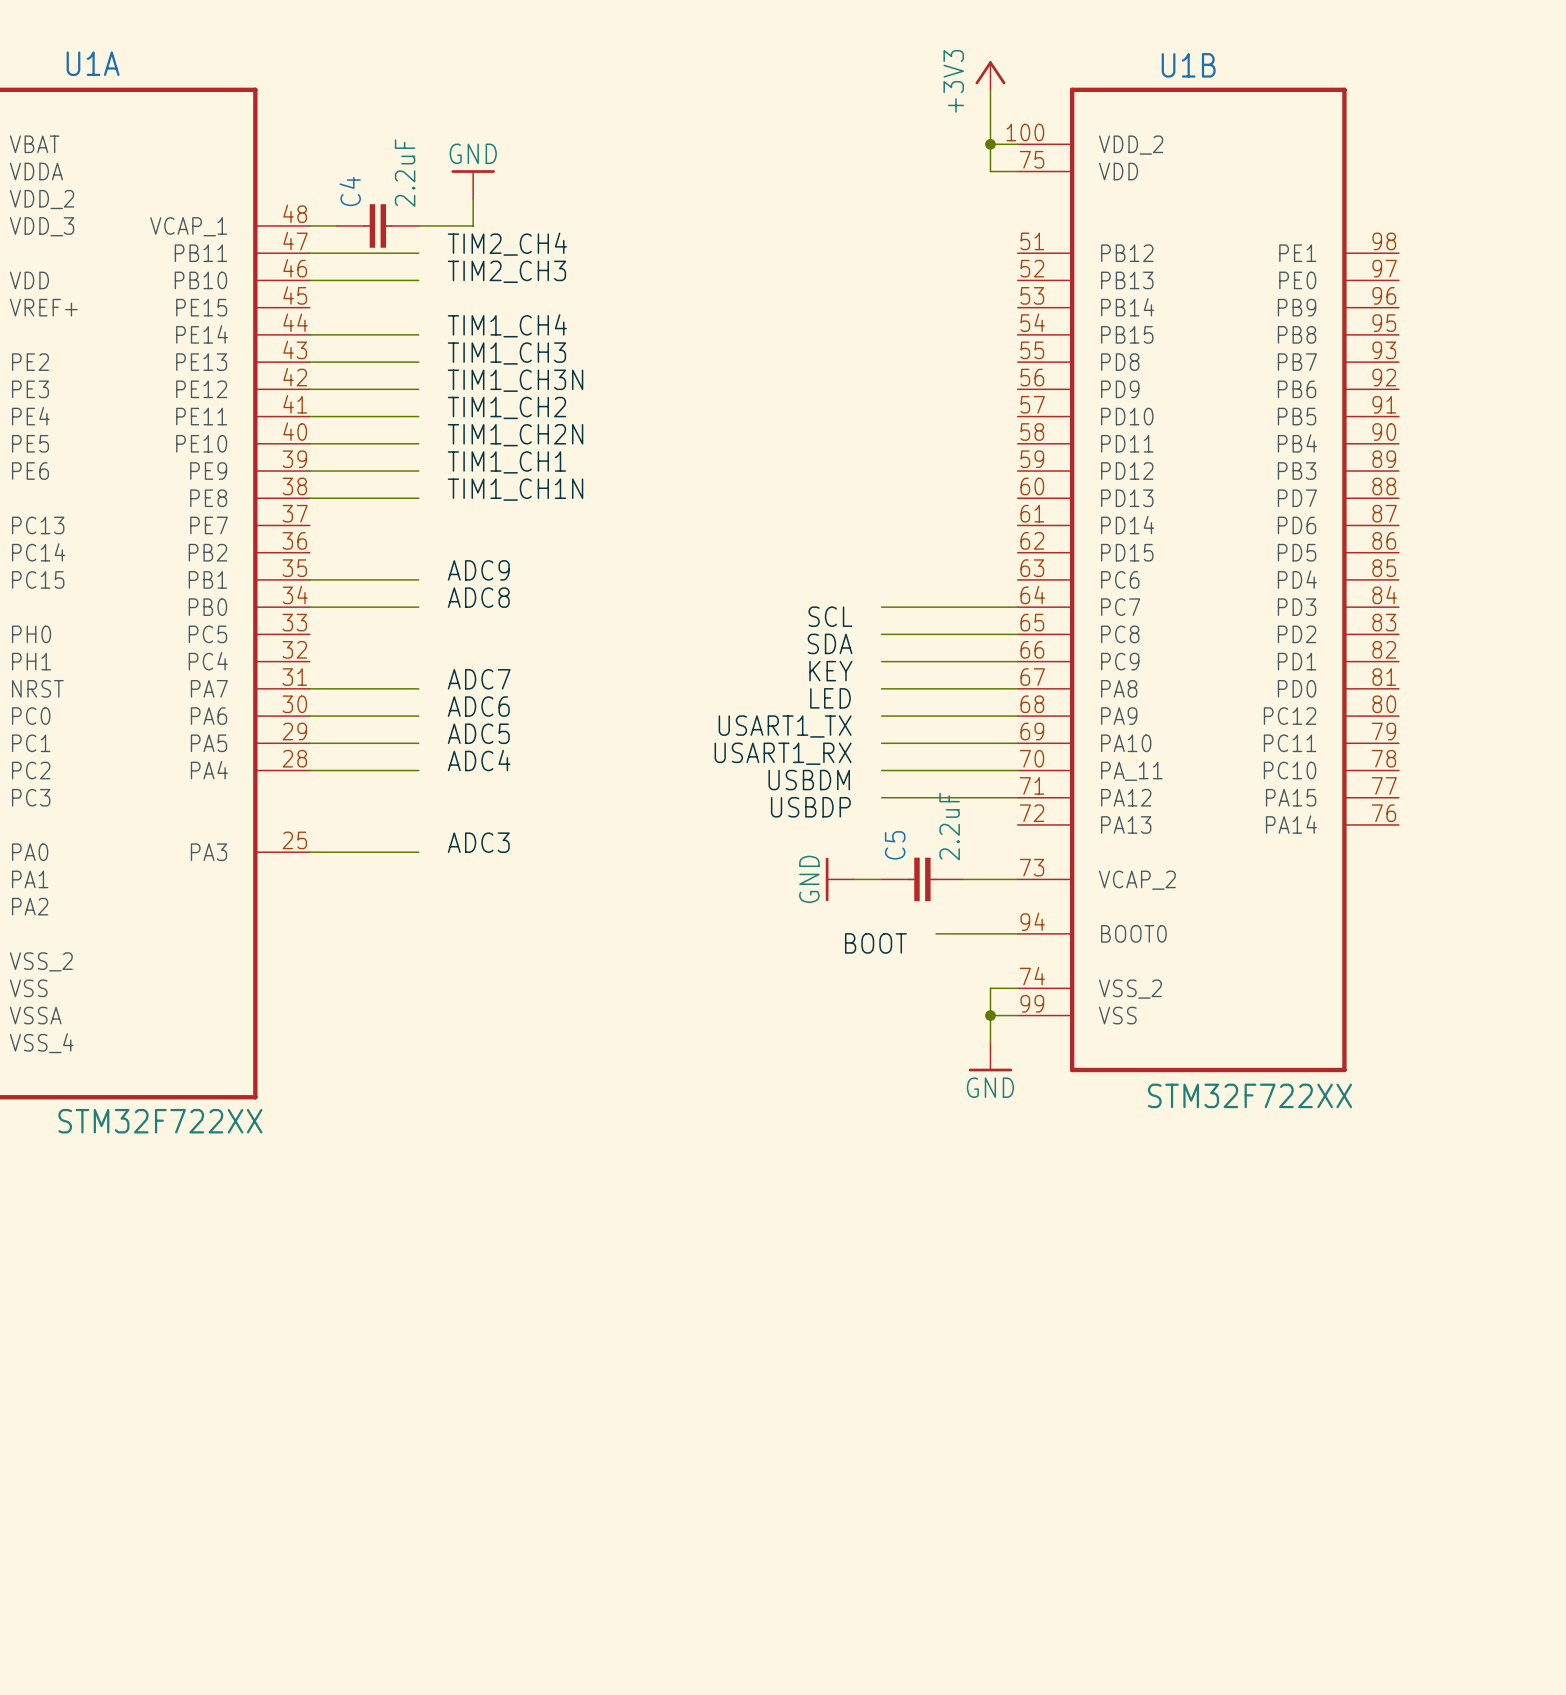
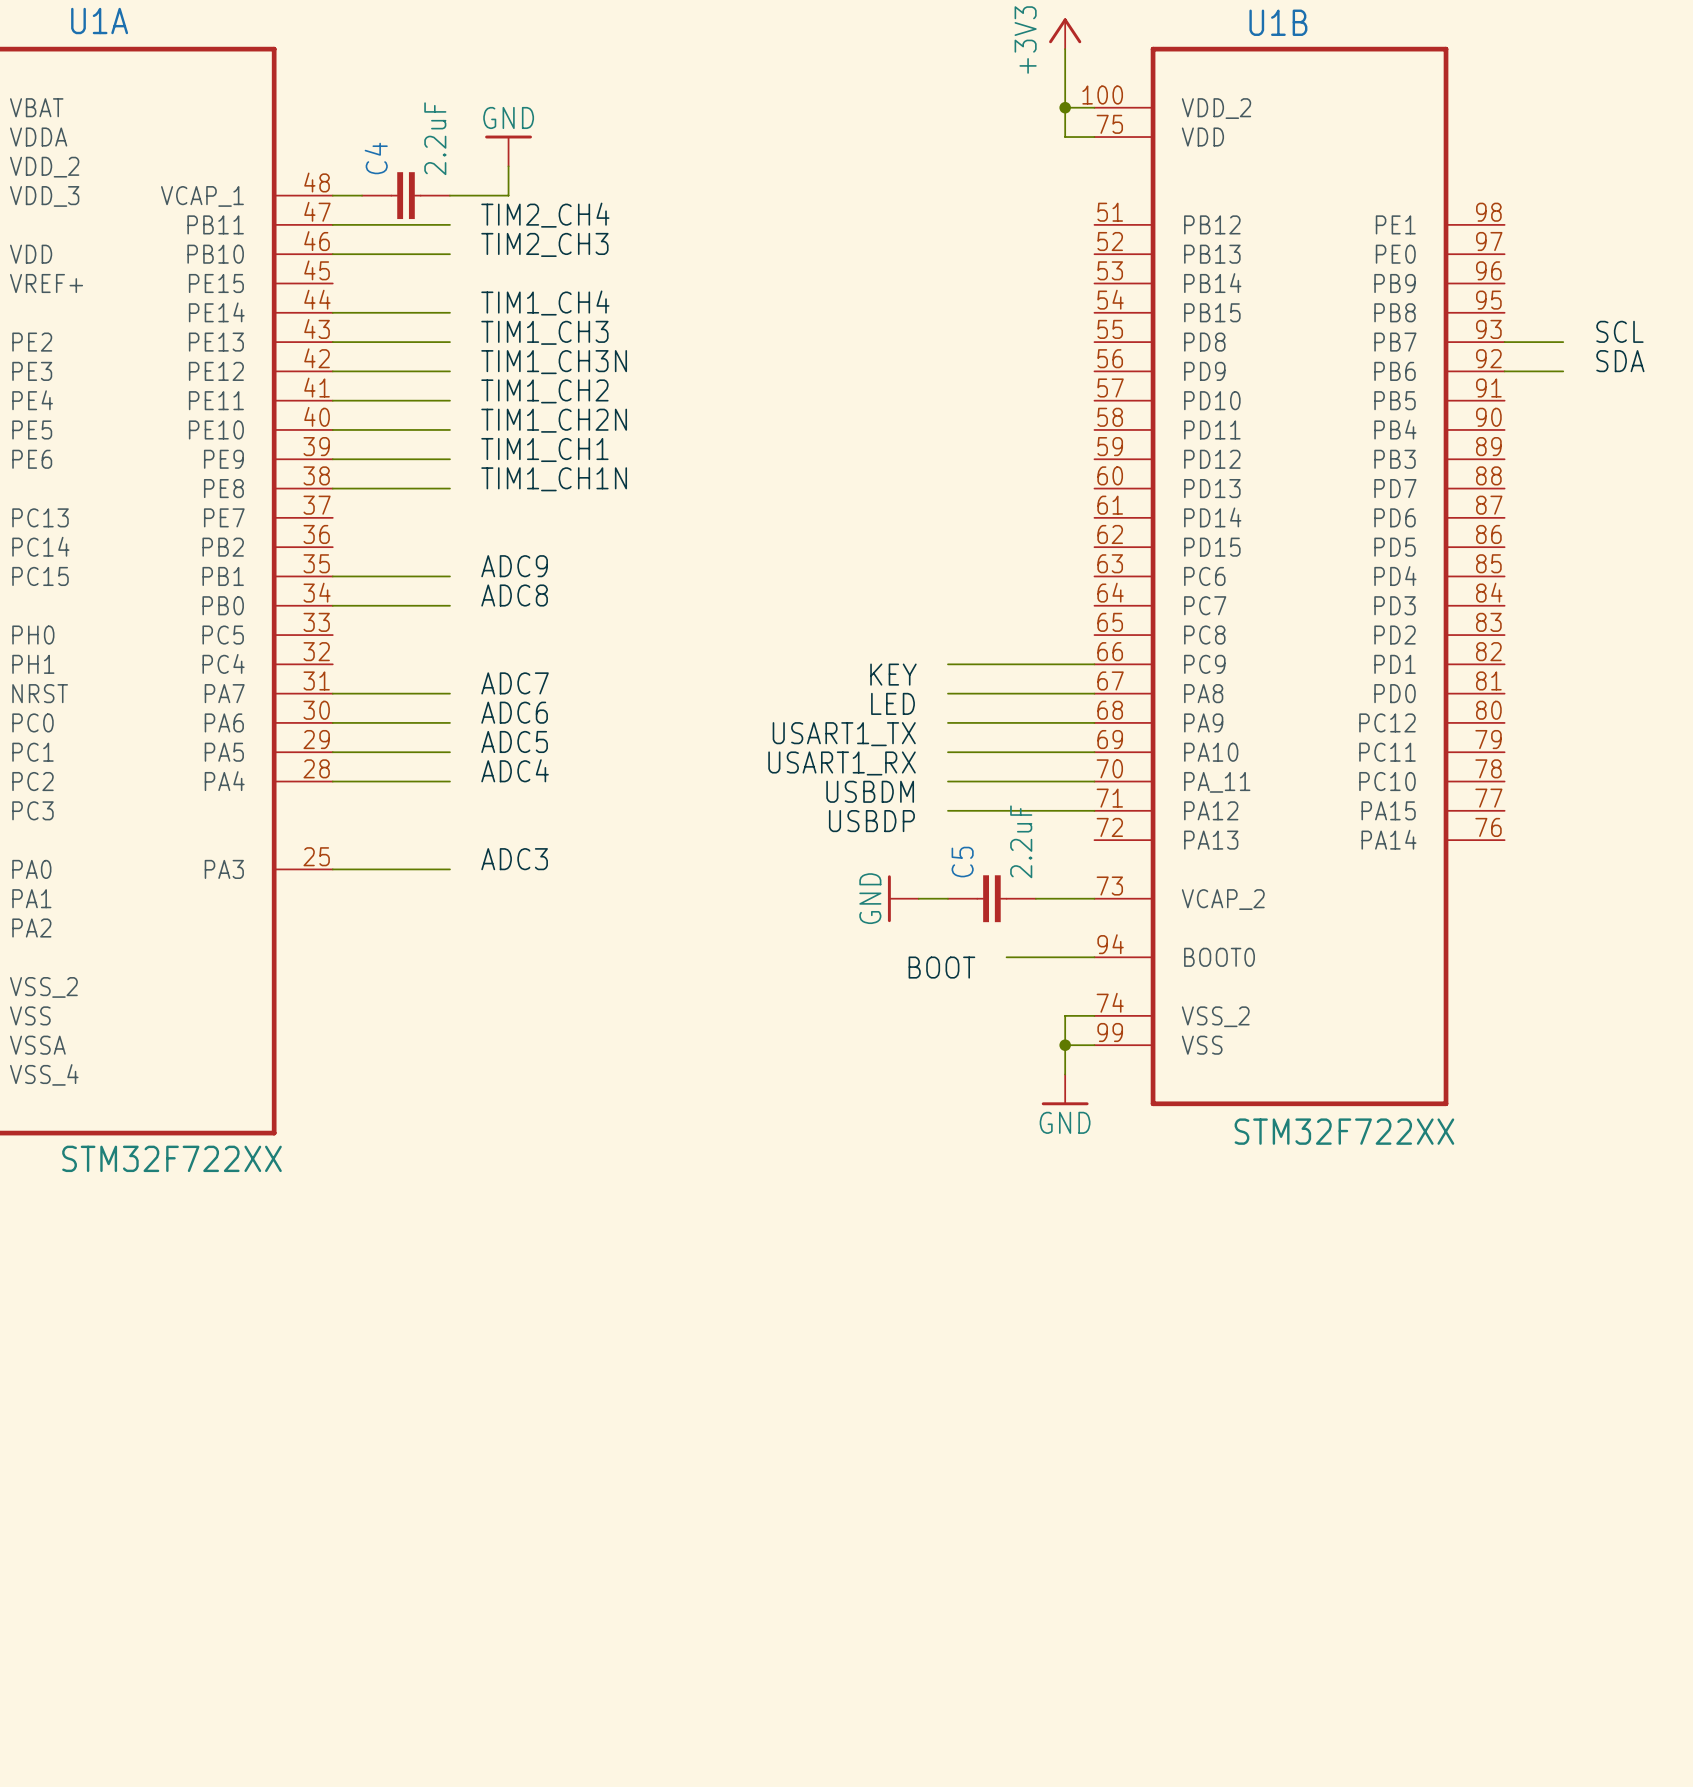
label: none -> SCL (1619, 331)
wire: none -> (1504, 342) (1563, 342)
label: none -> SDA (1620, 361)
wire: none -> (1504, 371) (1563, 371)
wire: (881, 607) (1017, 607) -> none
label: SCL (830, 616) -> none
wire: (881, 634) (1017, 634) -> none
label: SDA (830, 643) -> none

